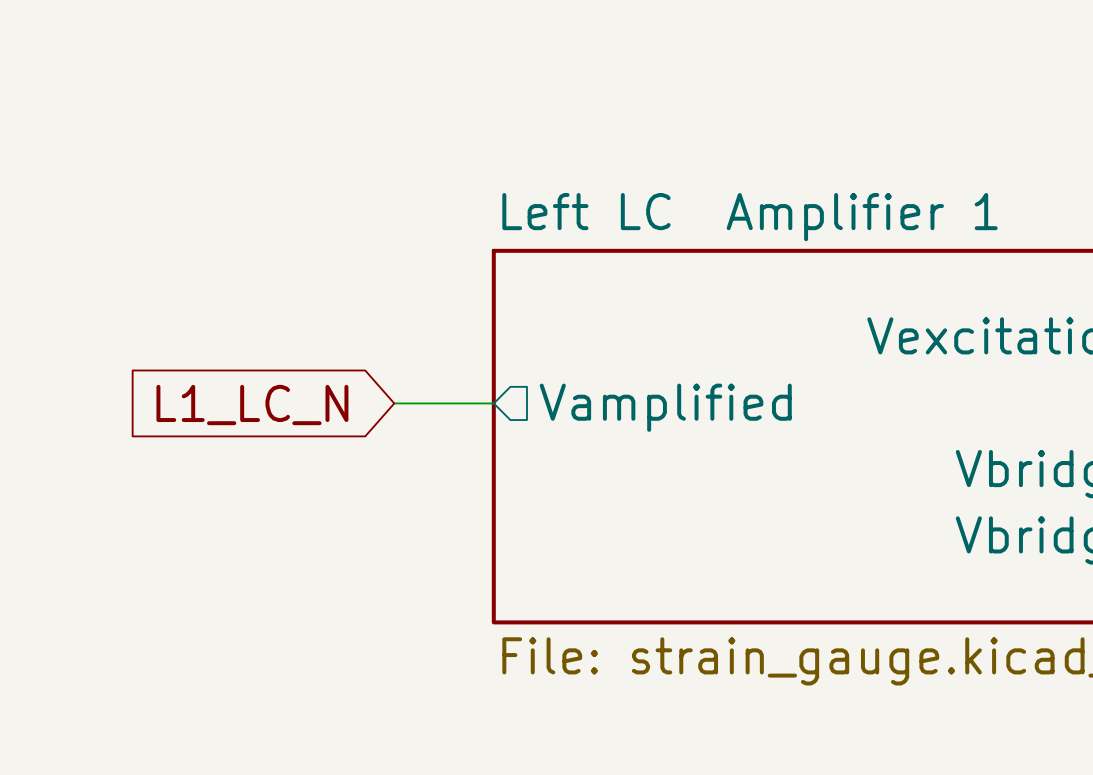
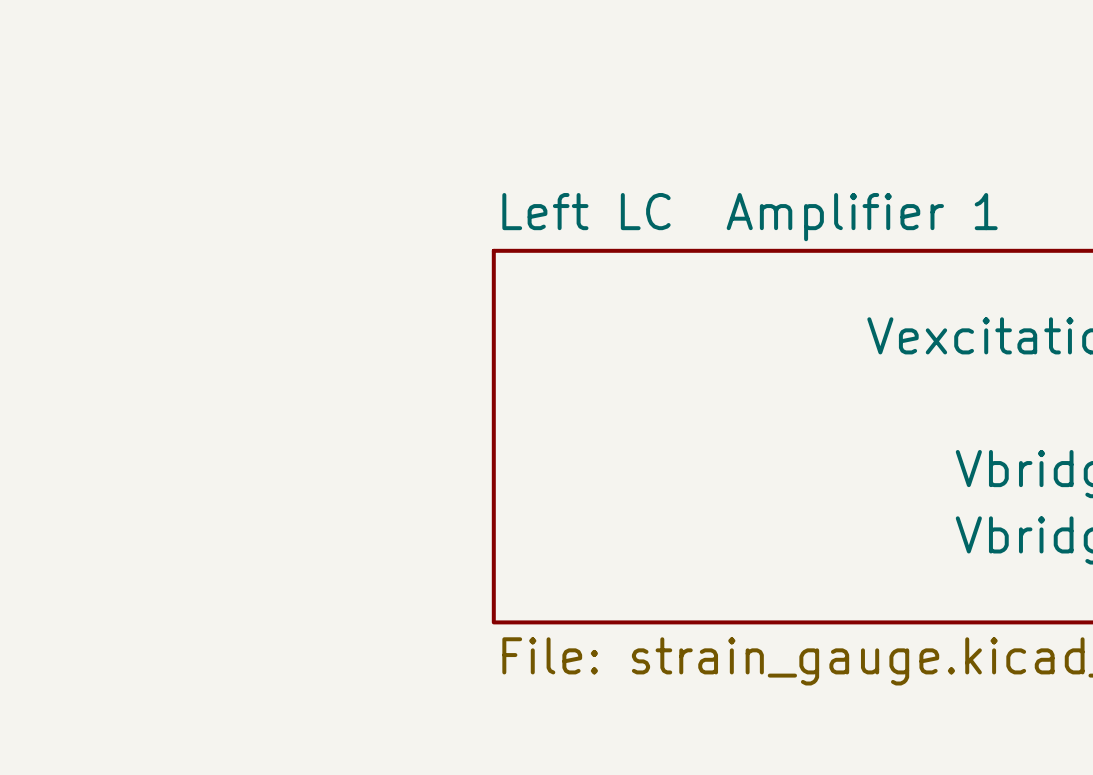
wire: (394, 403) (493, 403) -> none
global label: L1_LC_N (252, 405) -> none
sheet pin: Vamplified (665, 407) -> none

